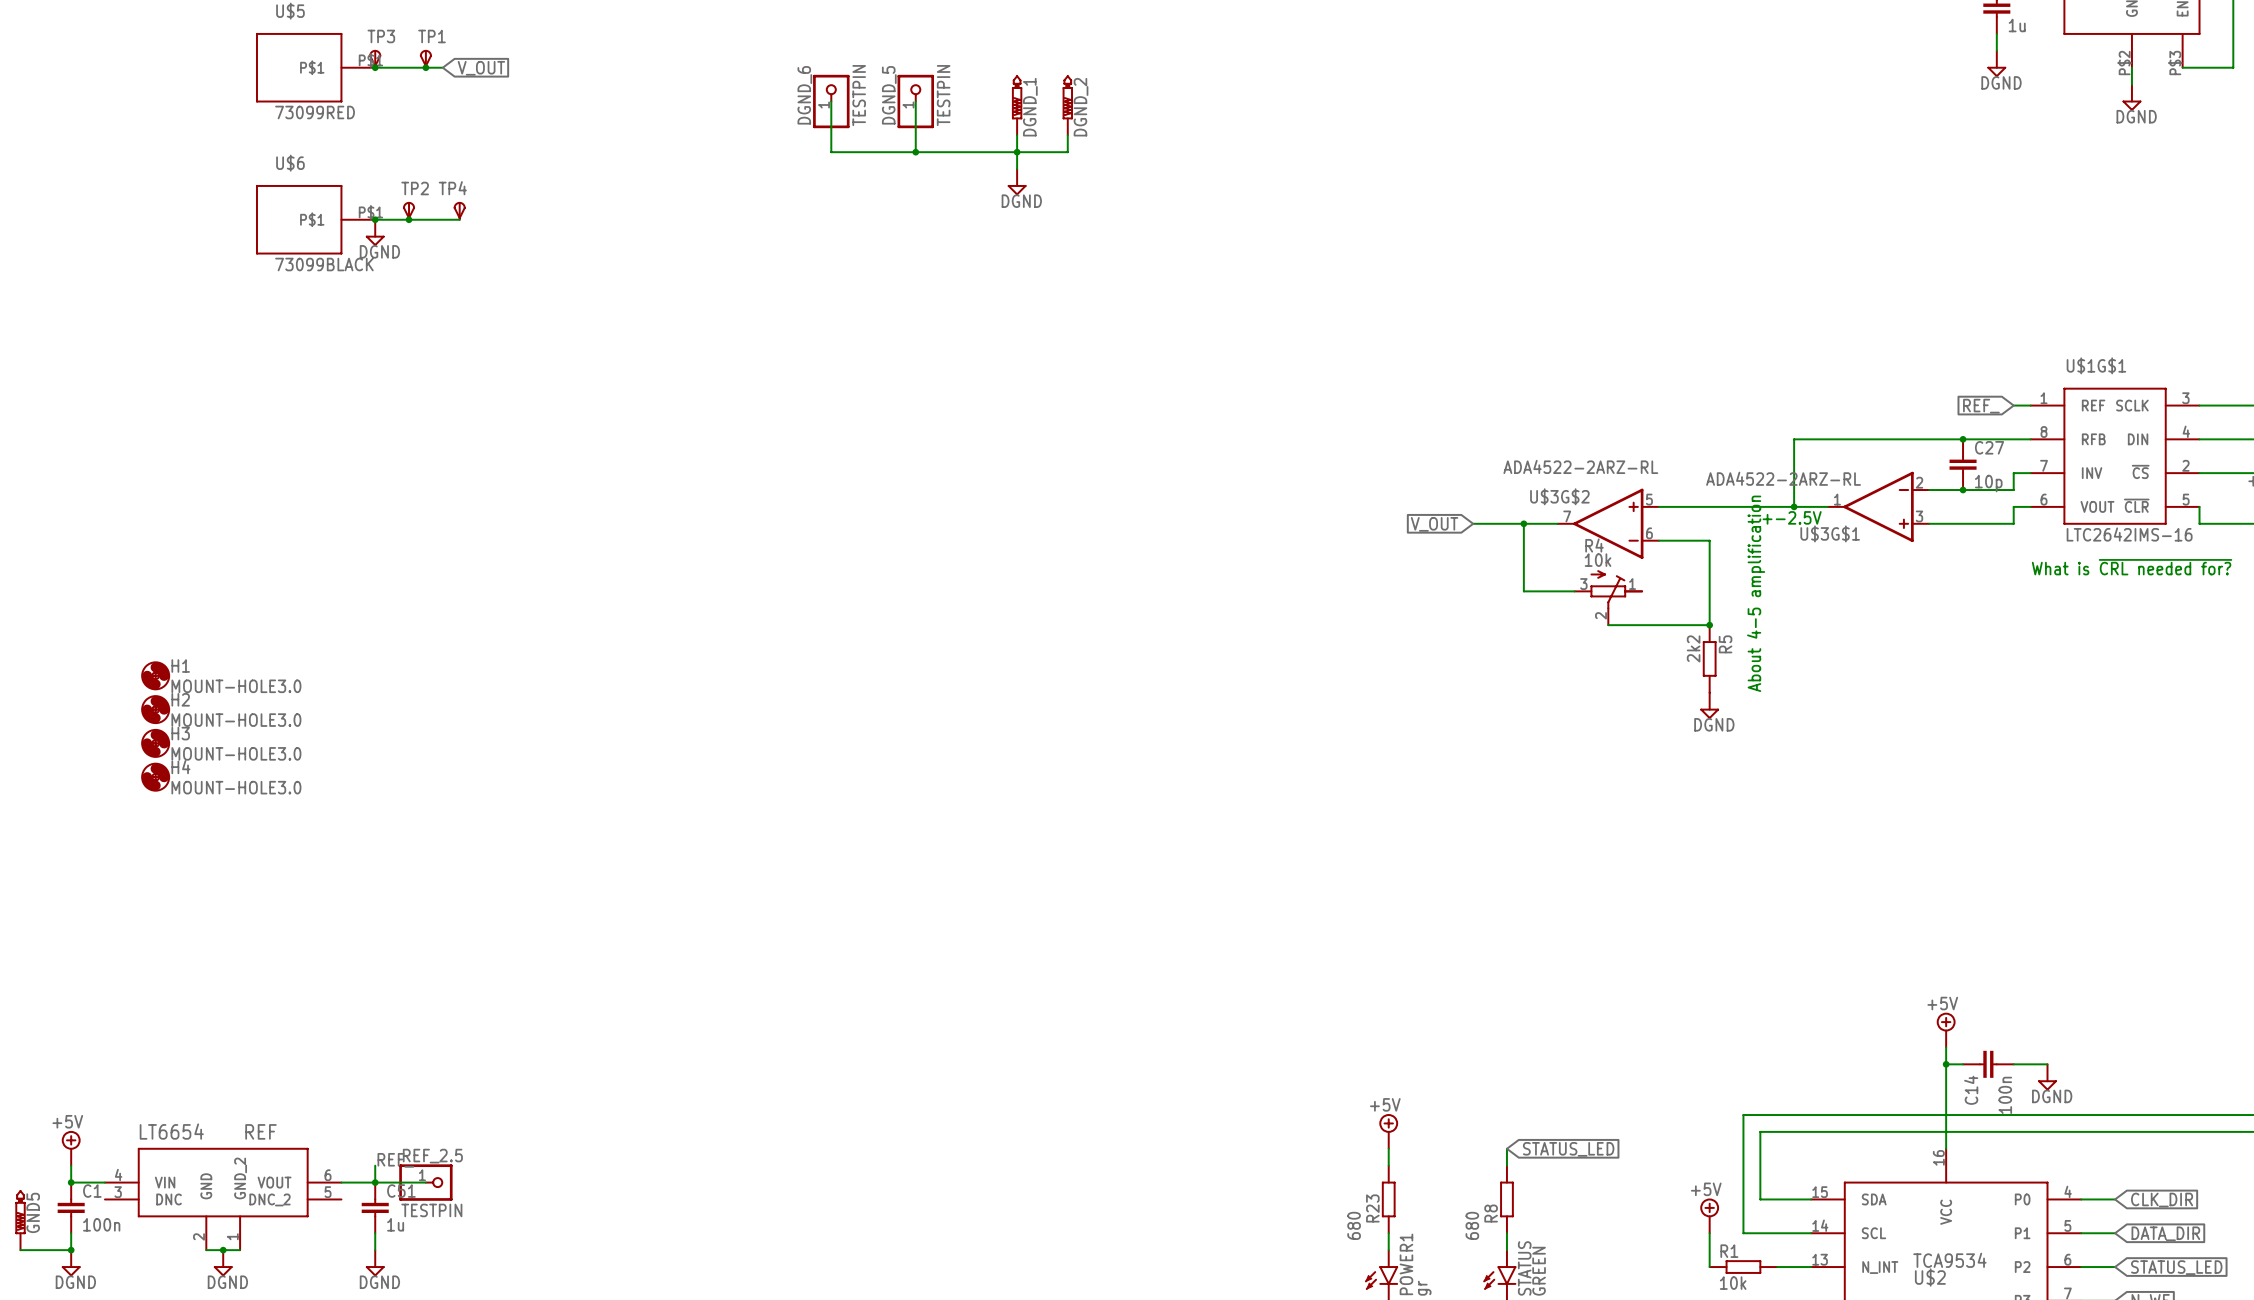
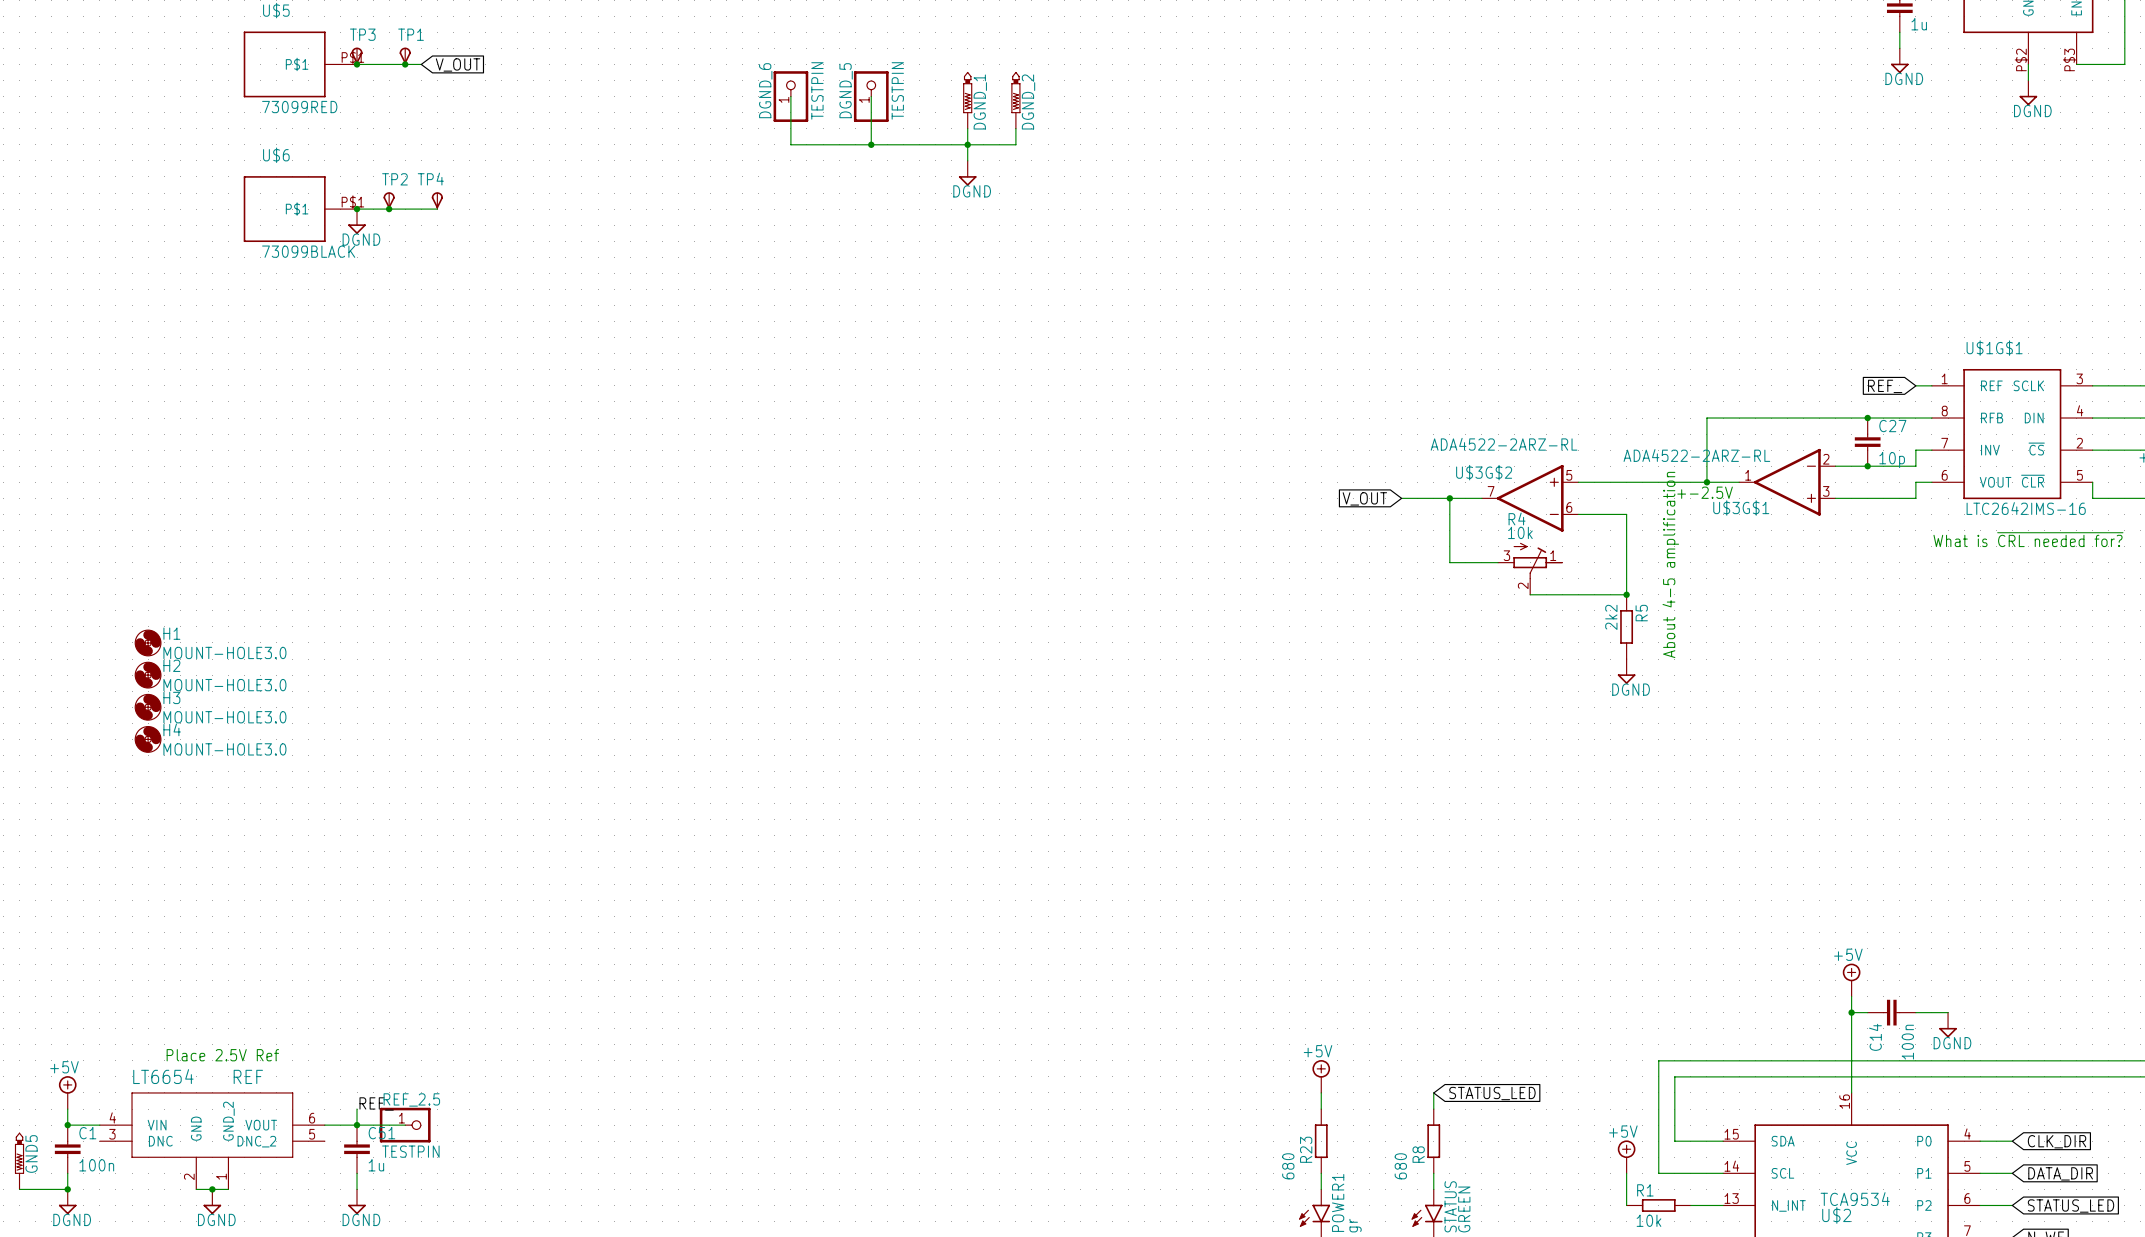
text: none -> Place 2.5V Ref (222, 1055)

